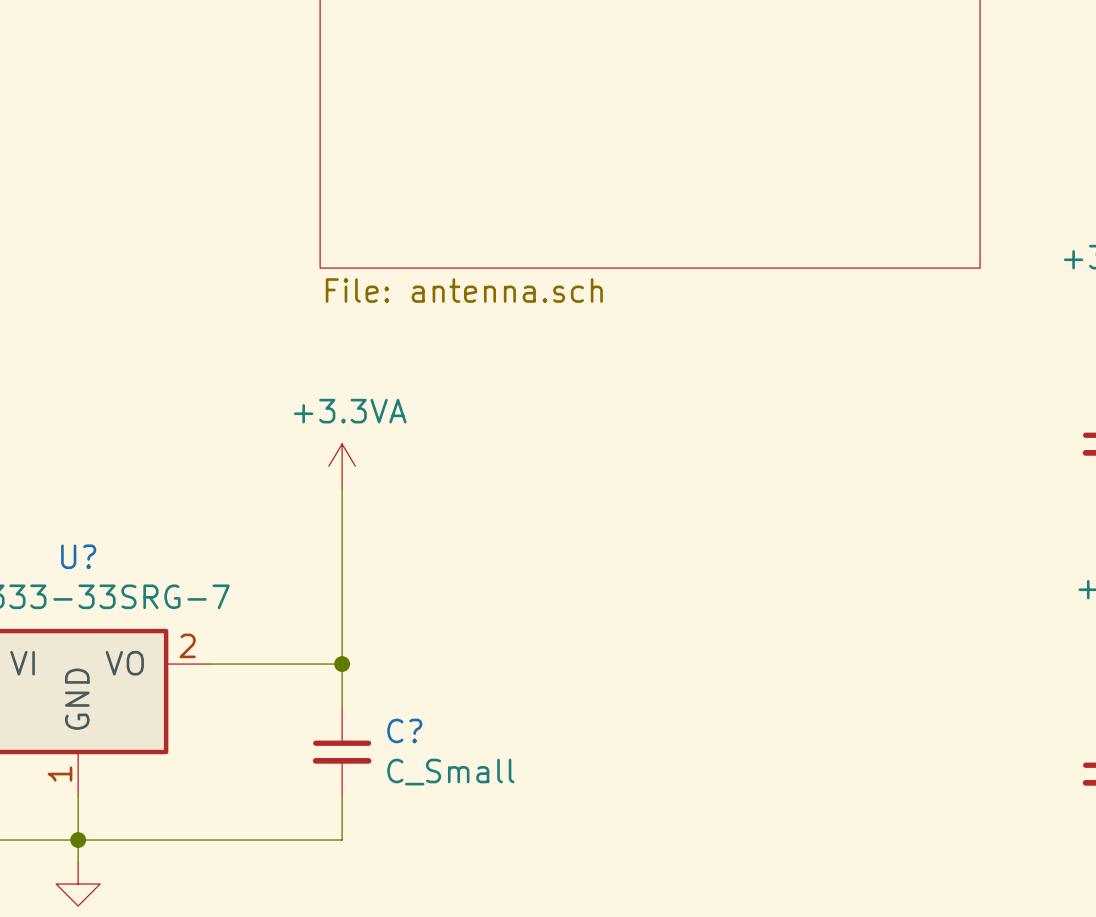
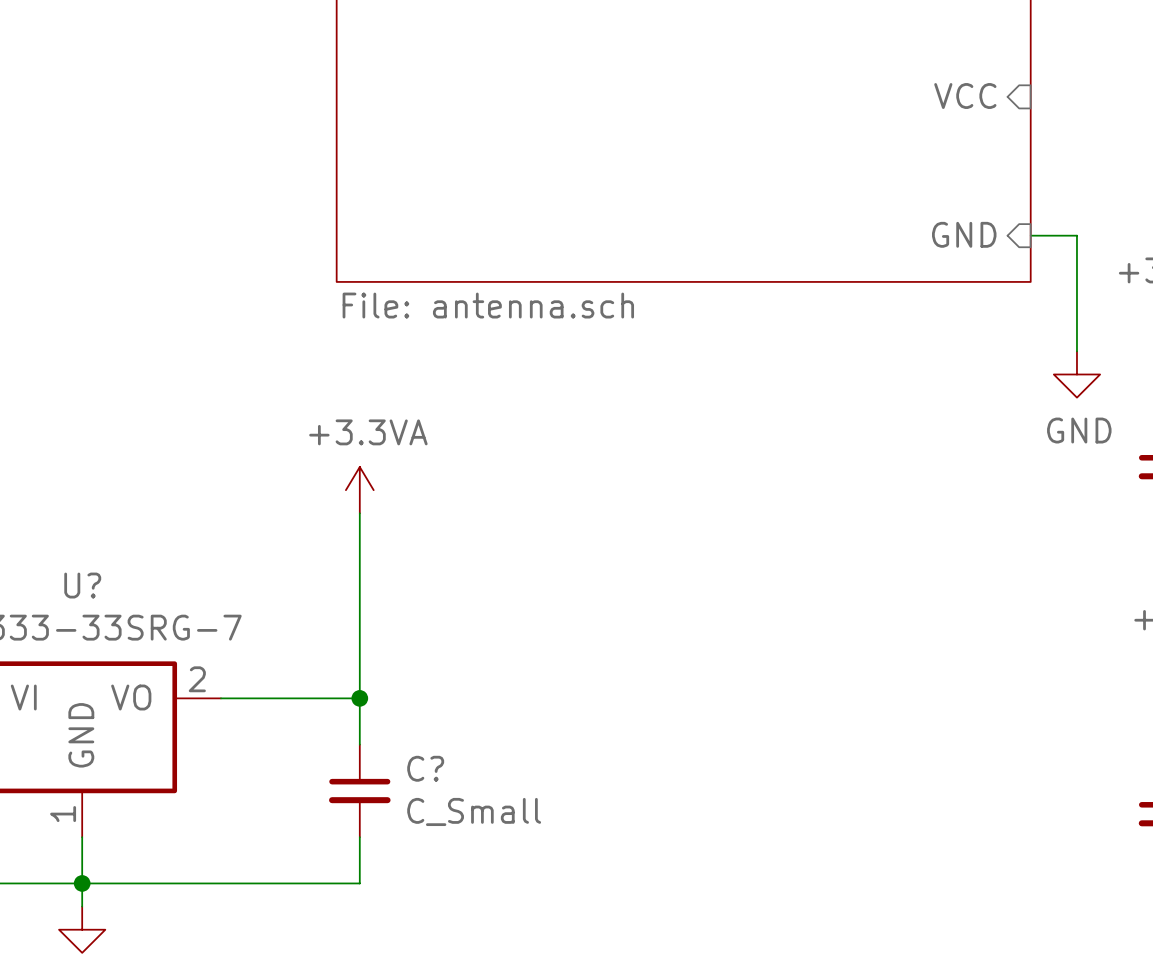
sheet pin: none -> VCC (965, 96)
sheet pin: none -> GND (964, 234)
wire: none -> (1030, 235) (1076, 235) (1076, 351)
power symbol: none -> GND (1076, 374)

